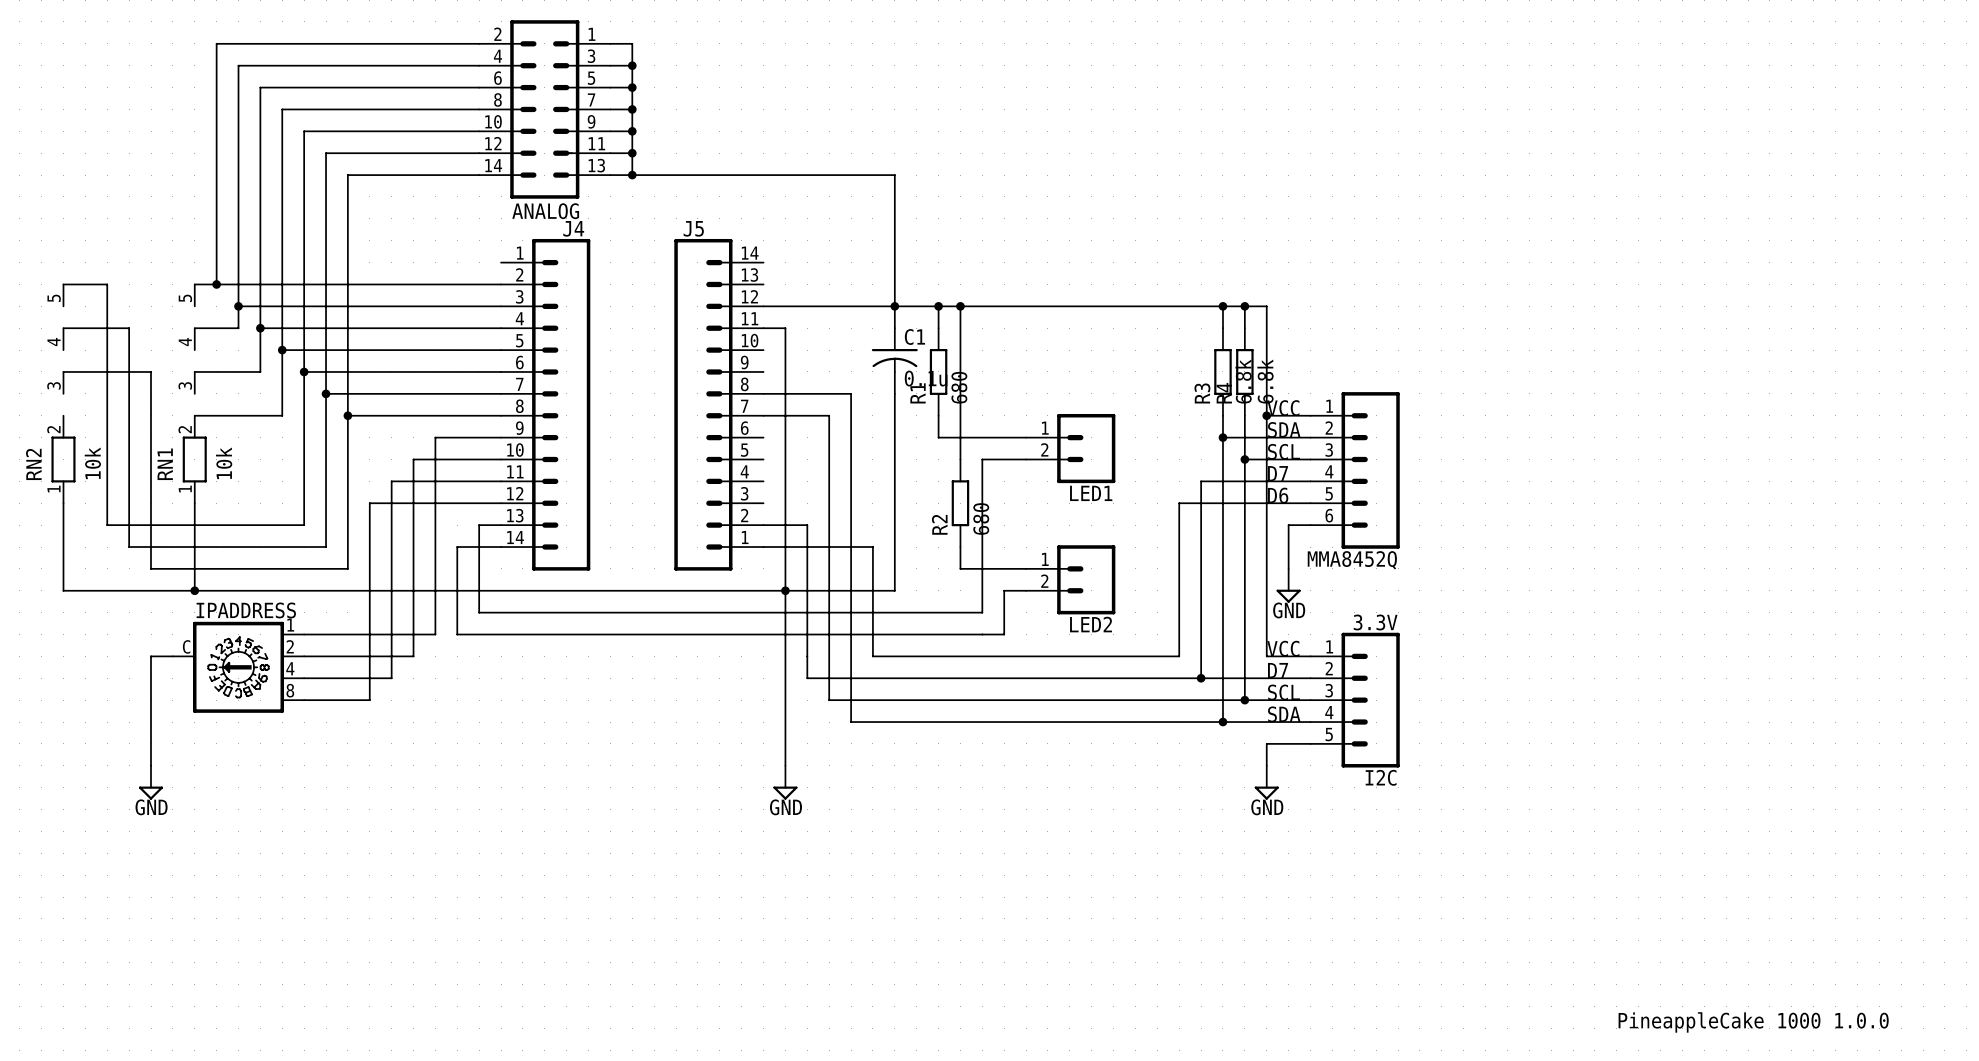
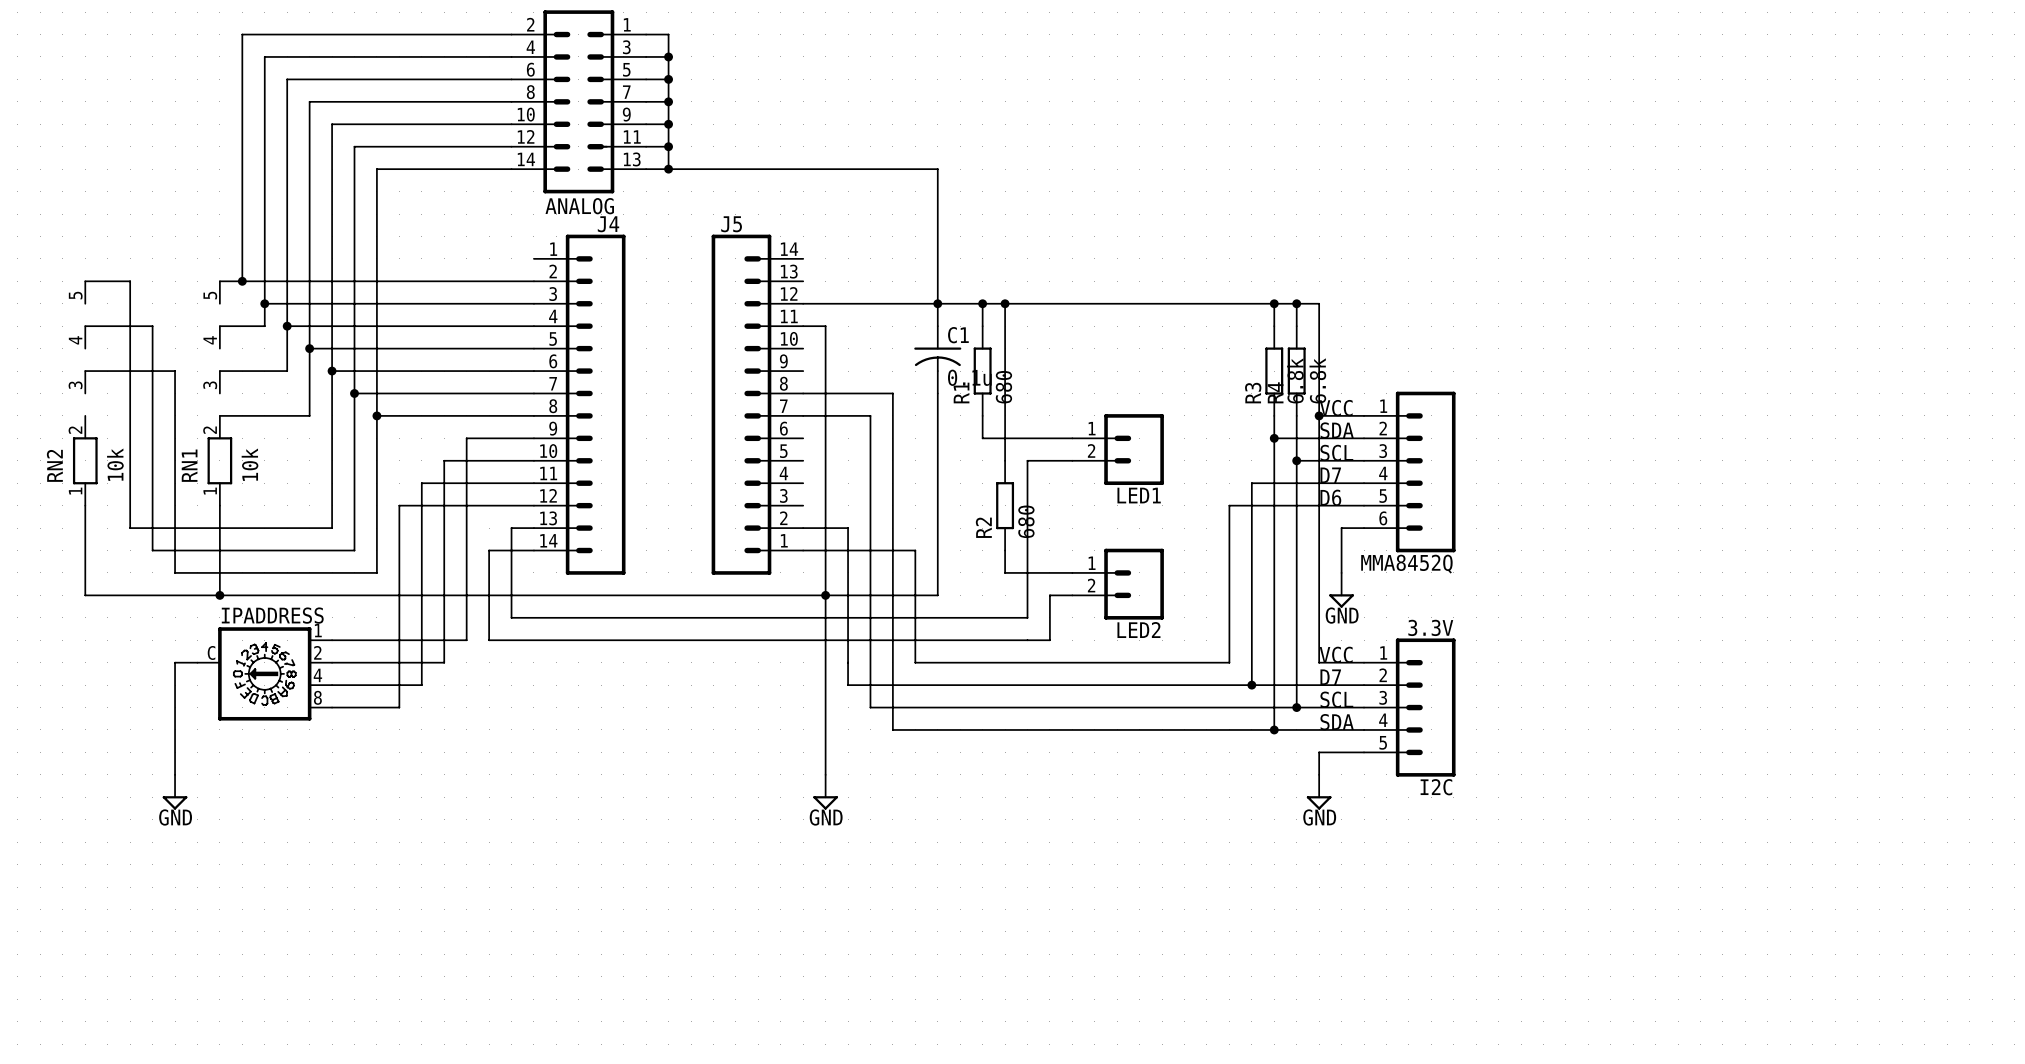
text: PineappleCake 1000 1.0.0 (1753, 1022) -> none

